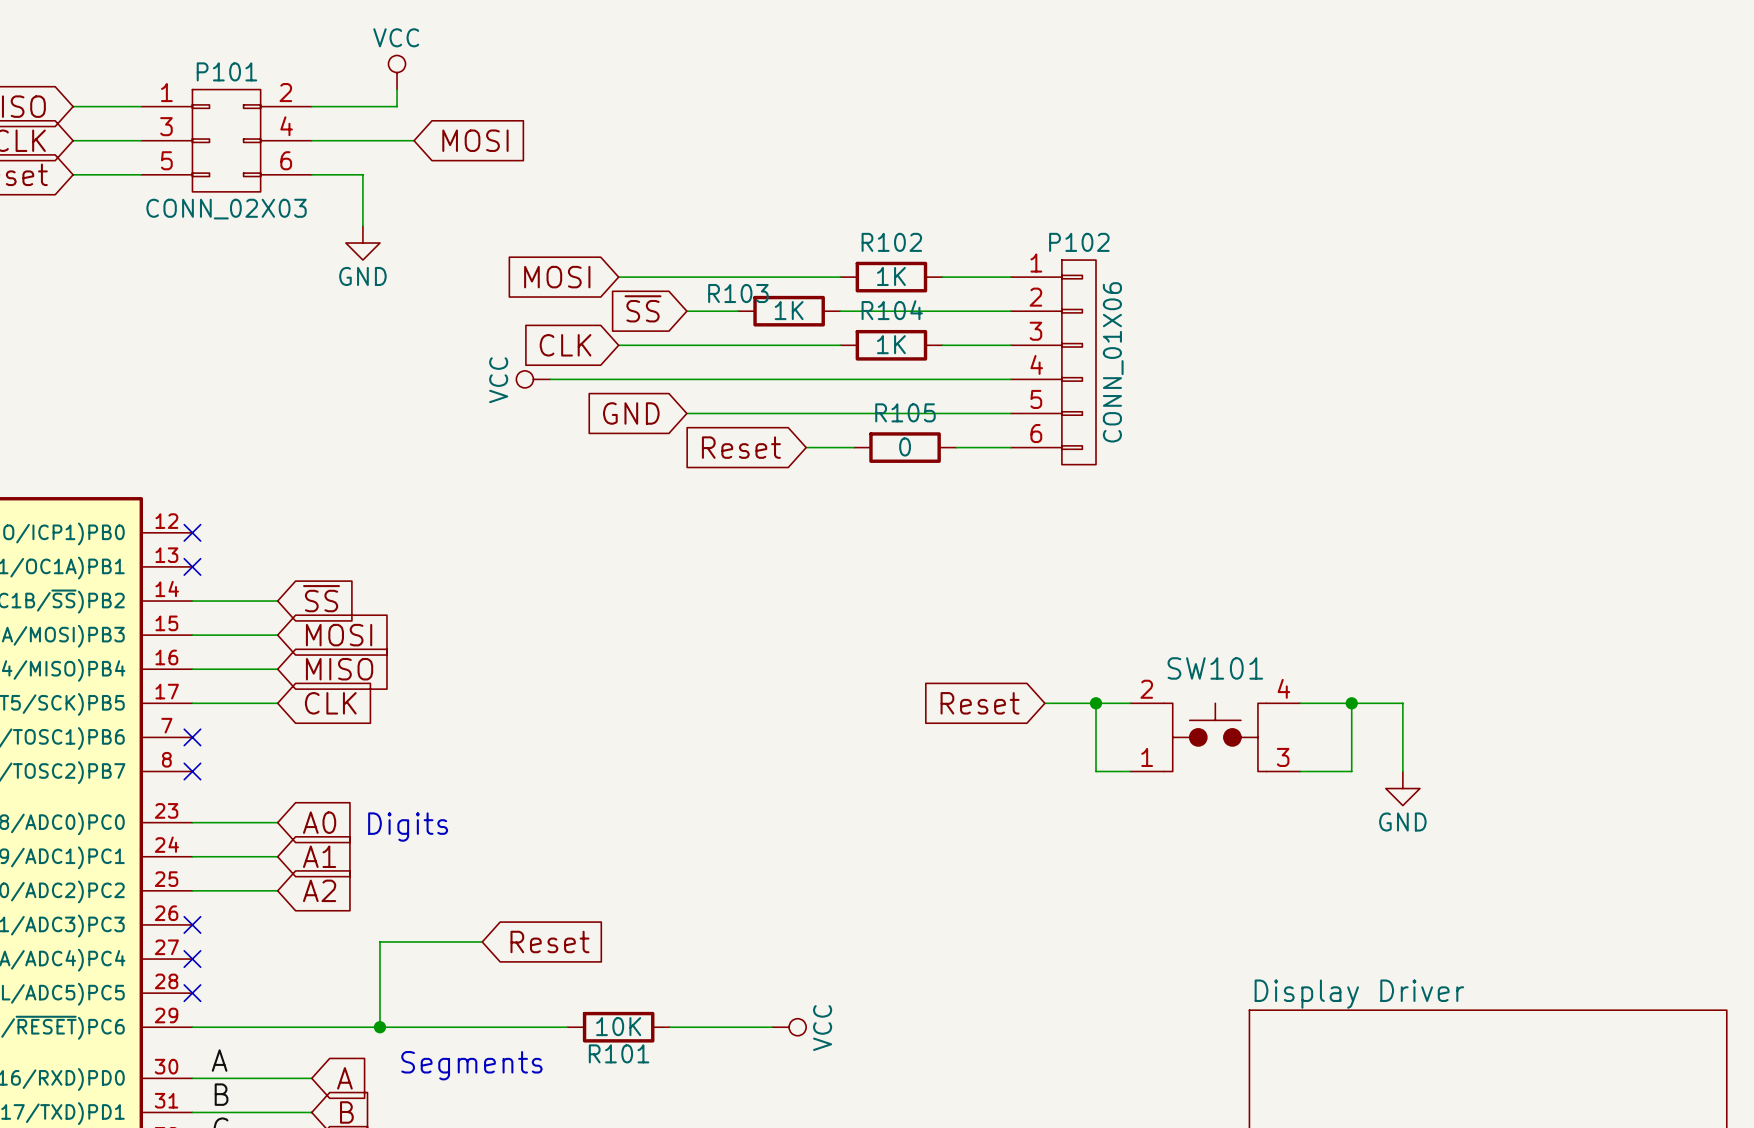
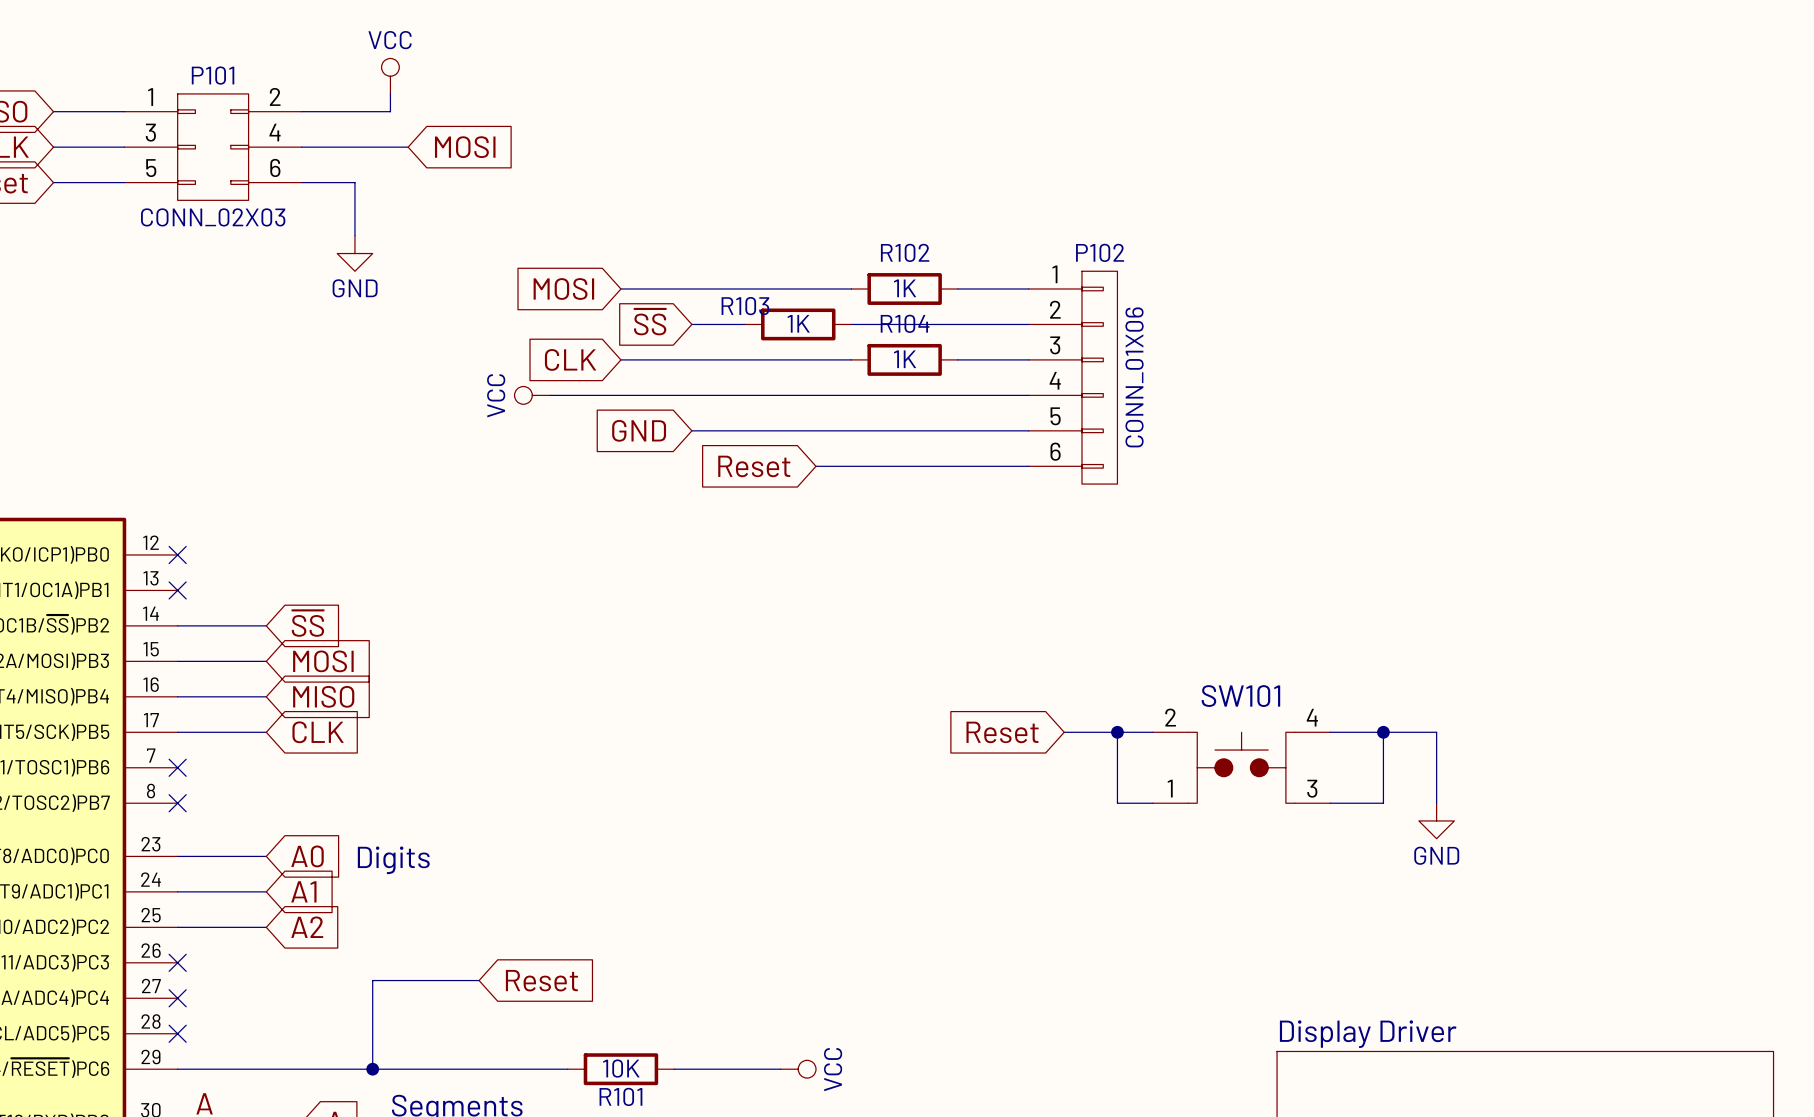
wire: none -> (865, 466) (972, 466)
R105: 0 (905, 447) -> none

